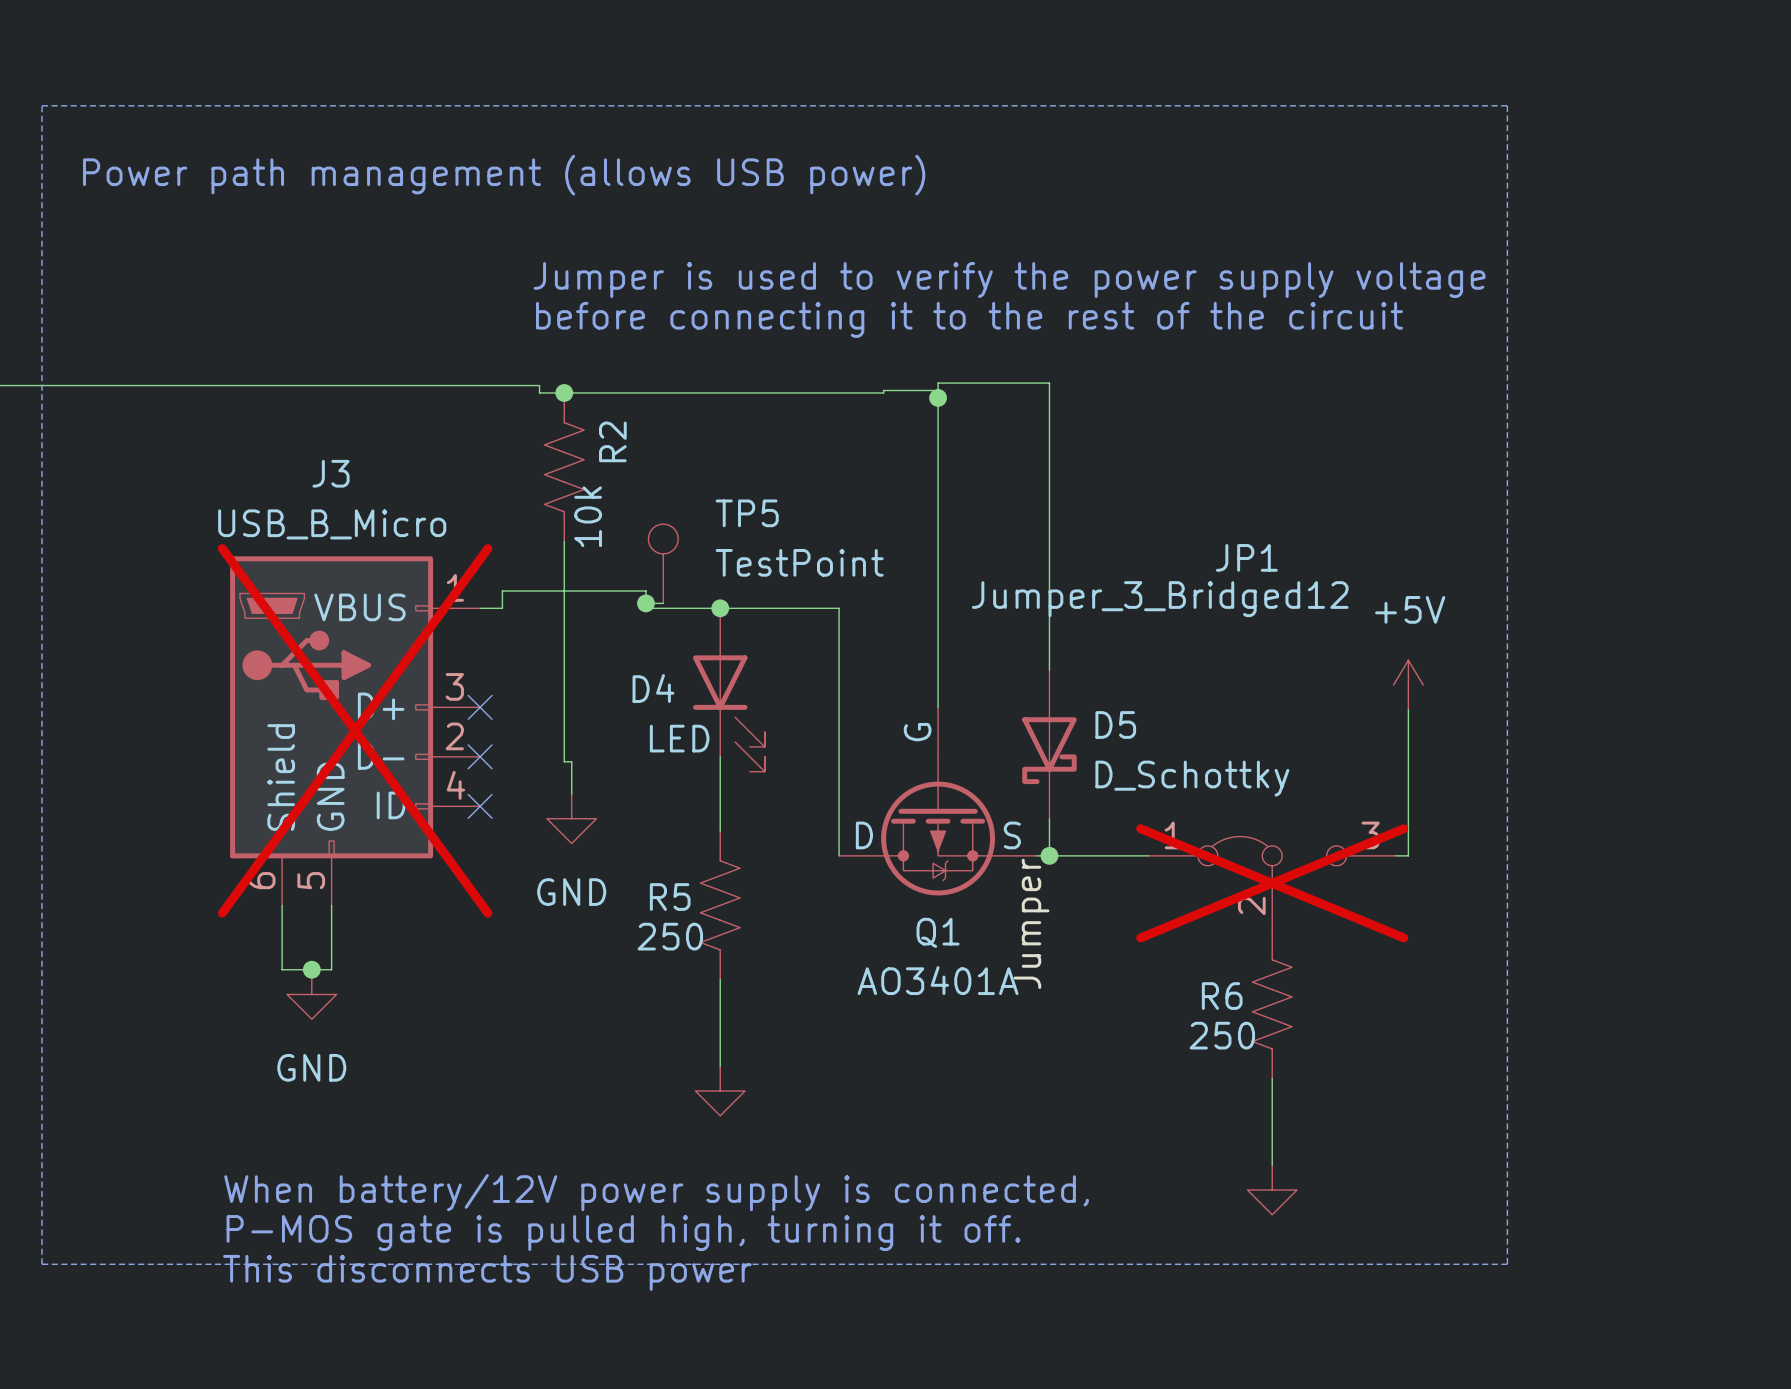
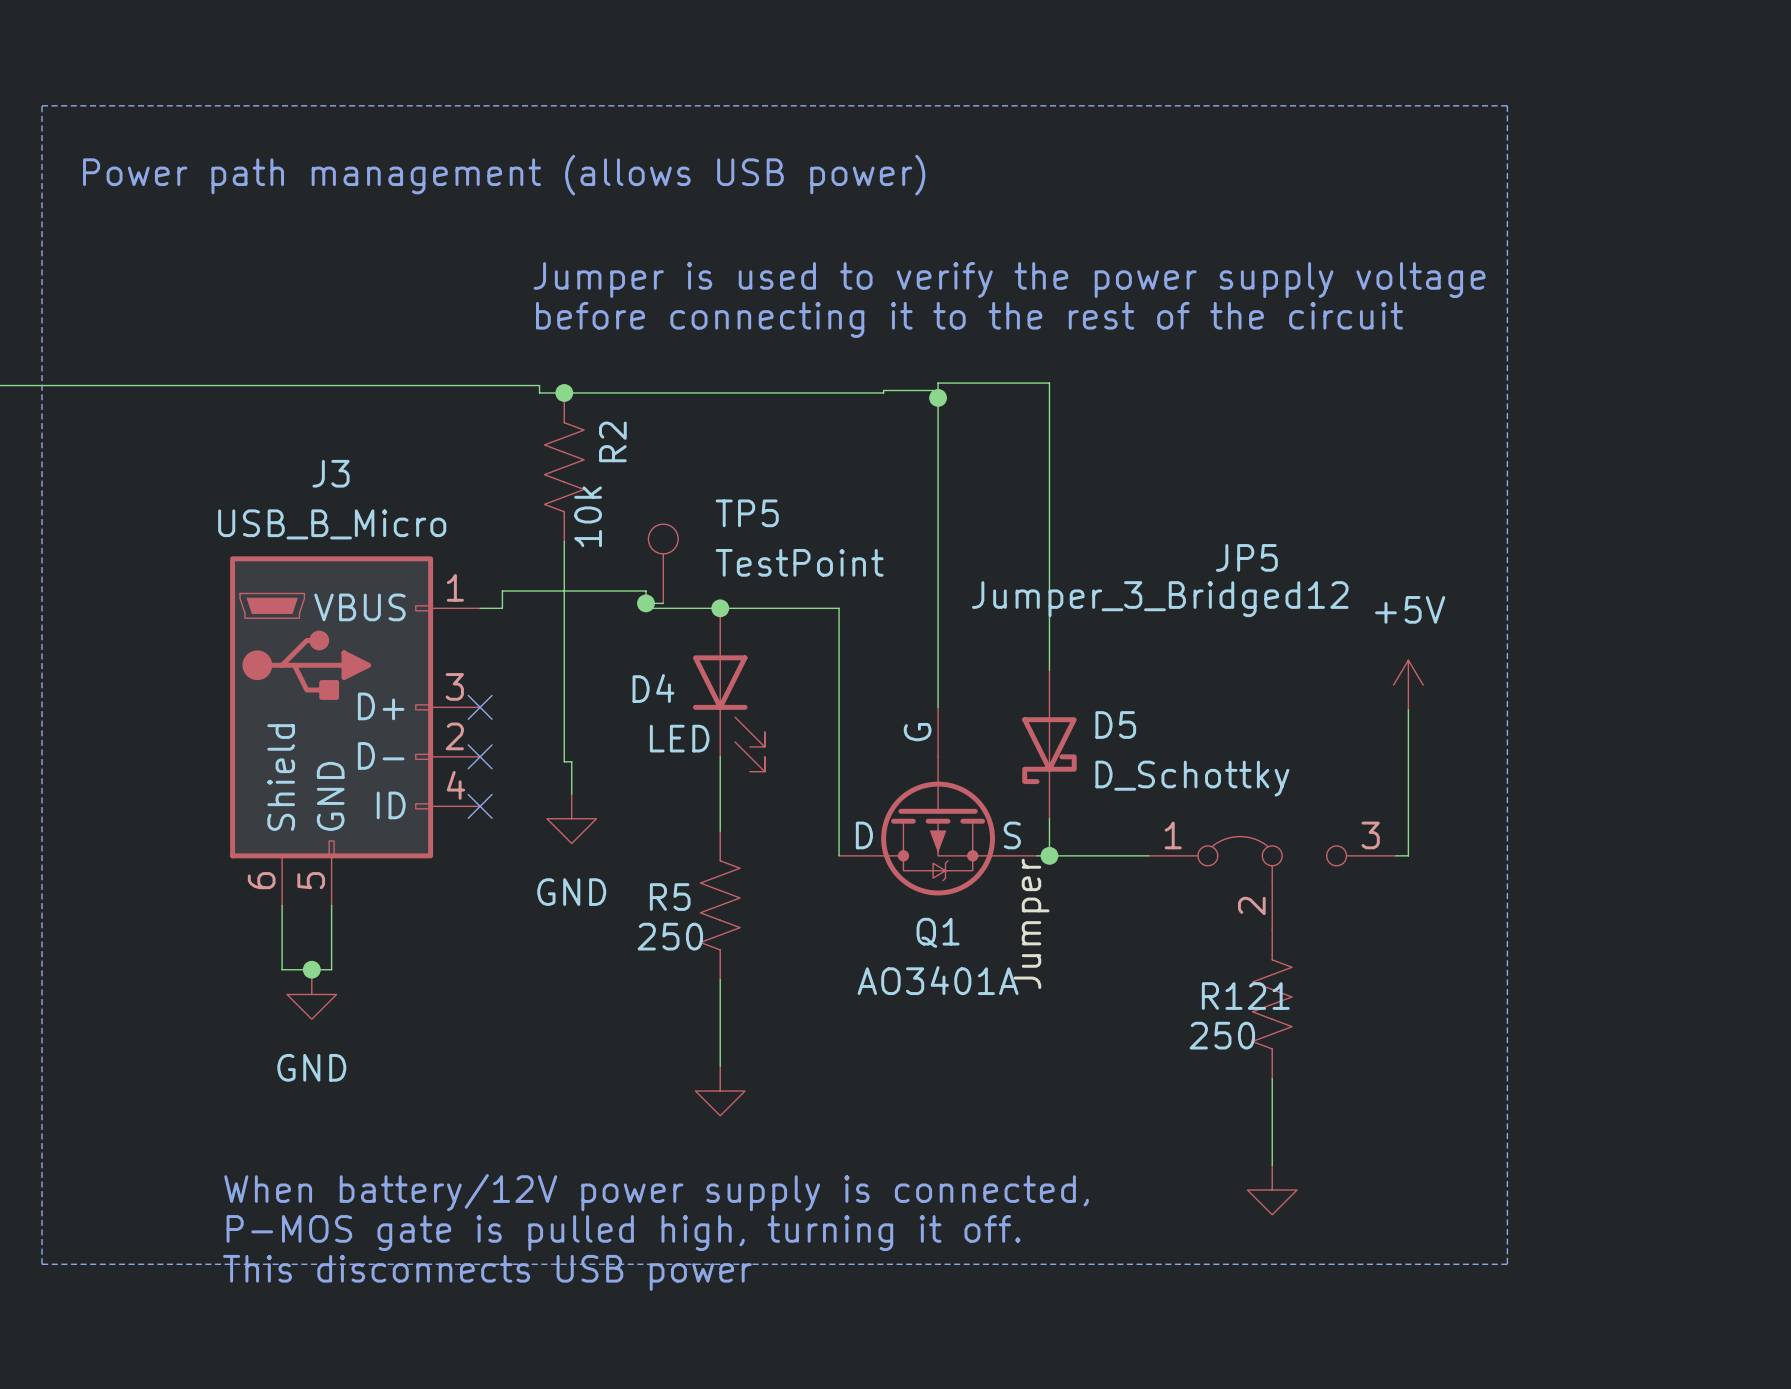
JP1 name: JP1 (1246, 557) -> JP5 (1246, 557)
J3 do-not-place cross: (355, 730) -> none
JP1 do-not-place cross: (1272, 883) -> none
R6 name: R6 (1222, 996) -> R121 (1245, 996)

